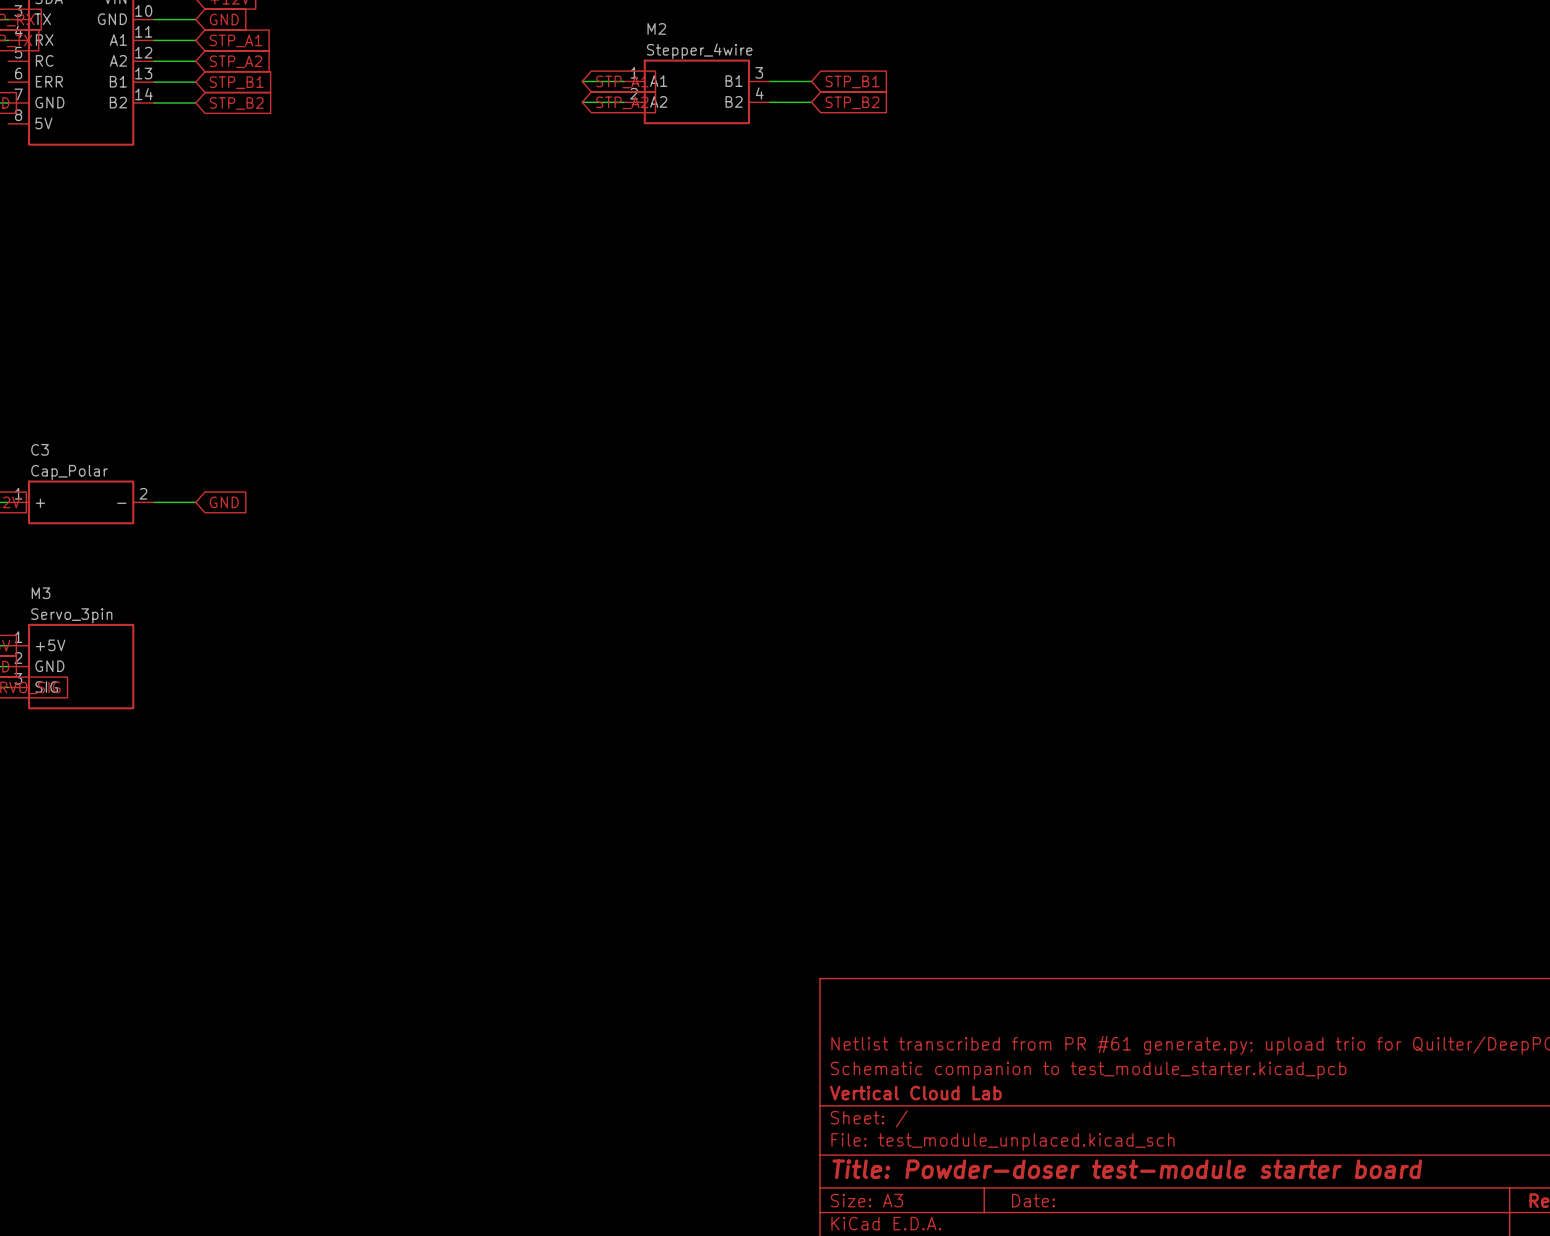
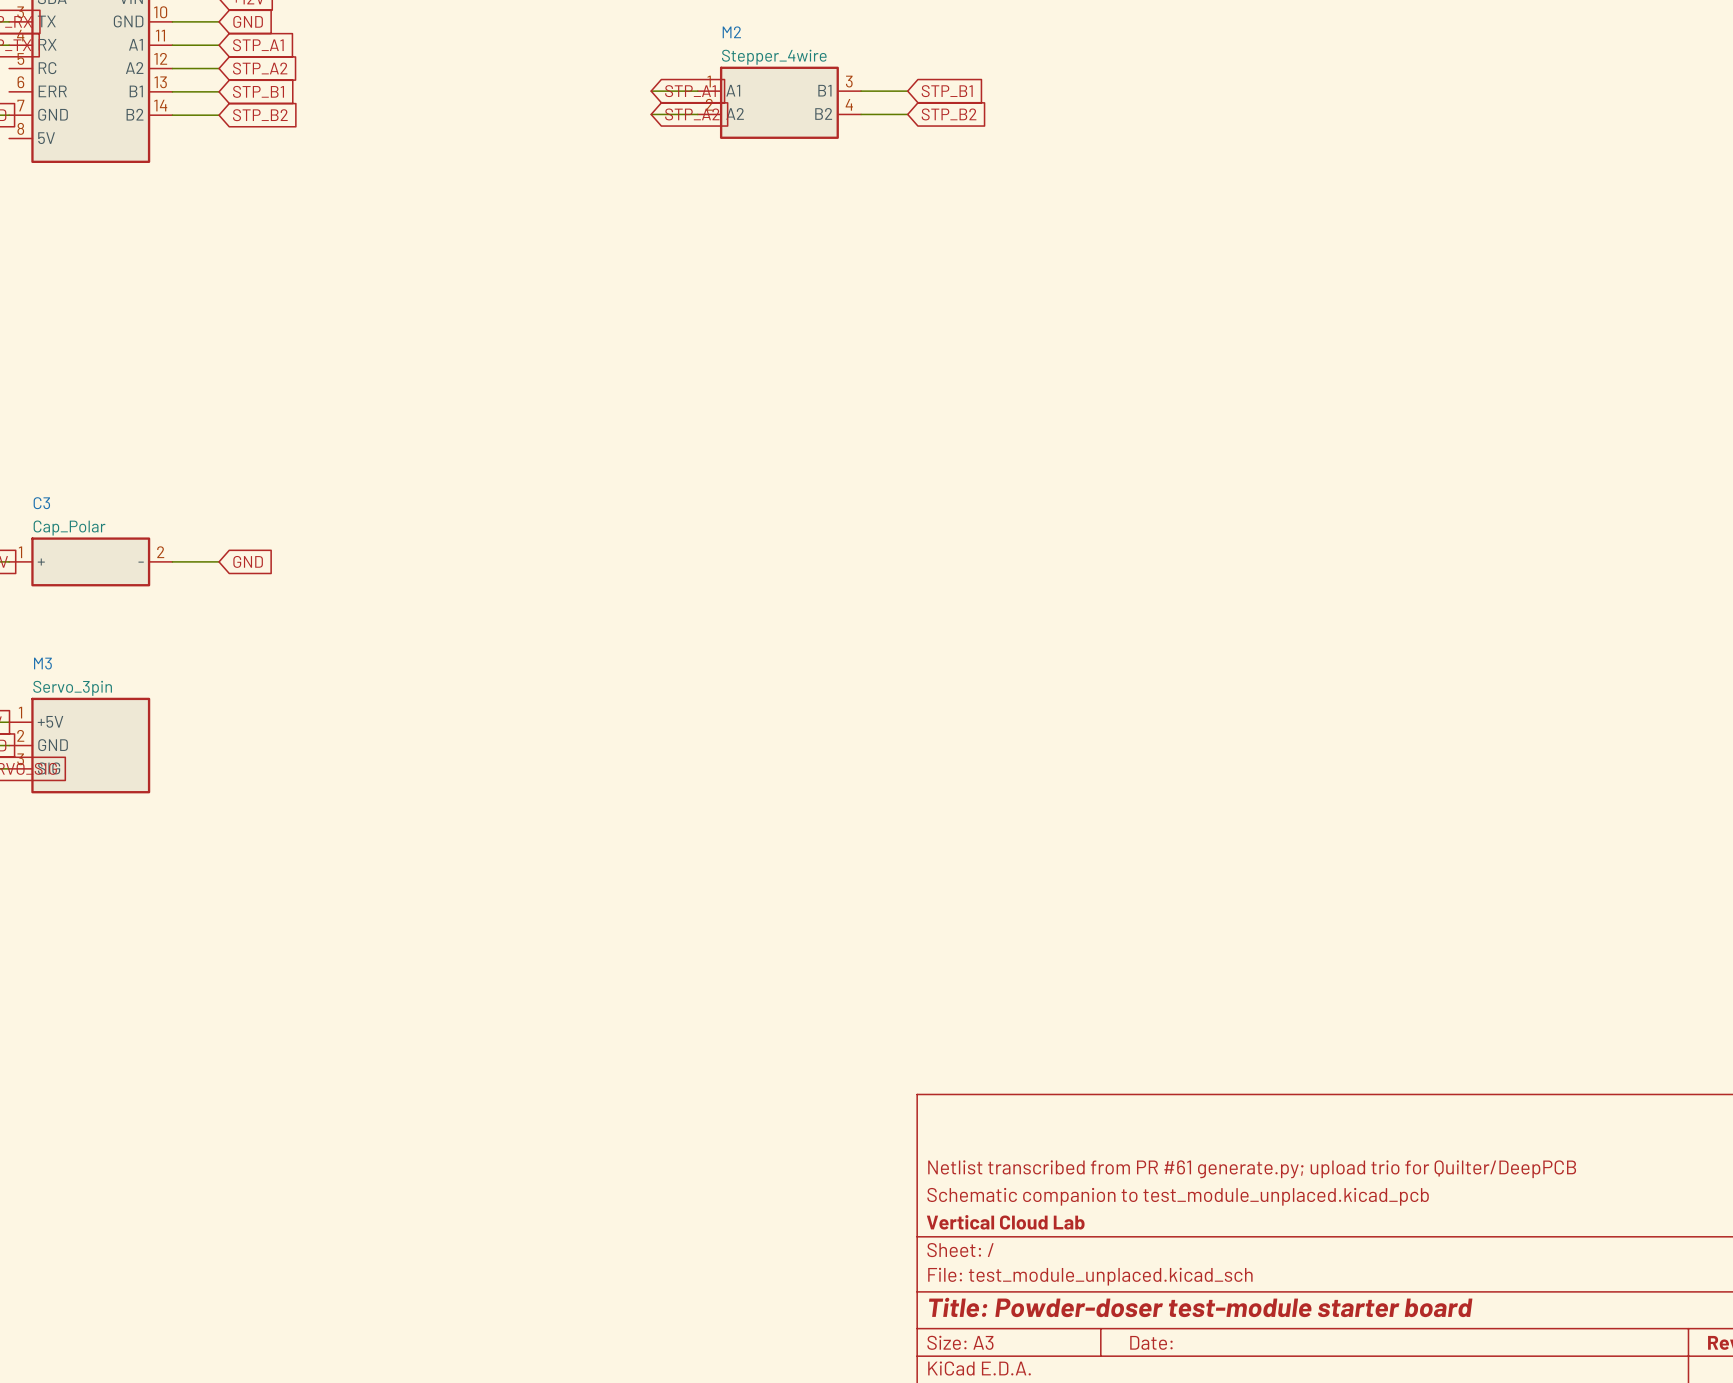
title block: Schematic companion to test_module_starter.kicad_pcb (1088, 1070) -> Schematic companion to test_module_unplaced.kicad_pcb (1178, 1196)

